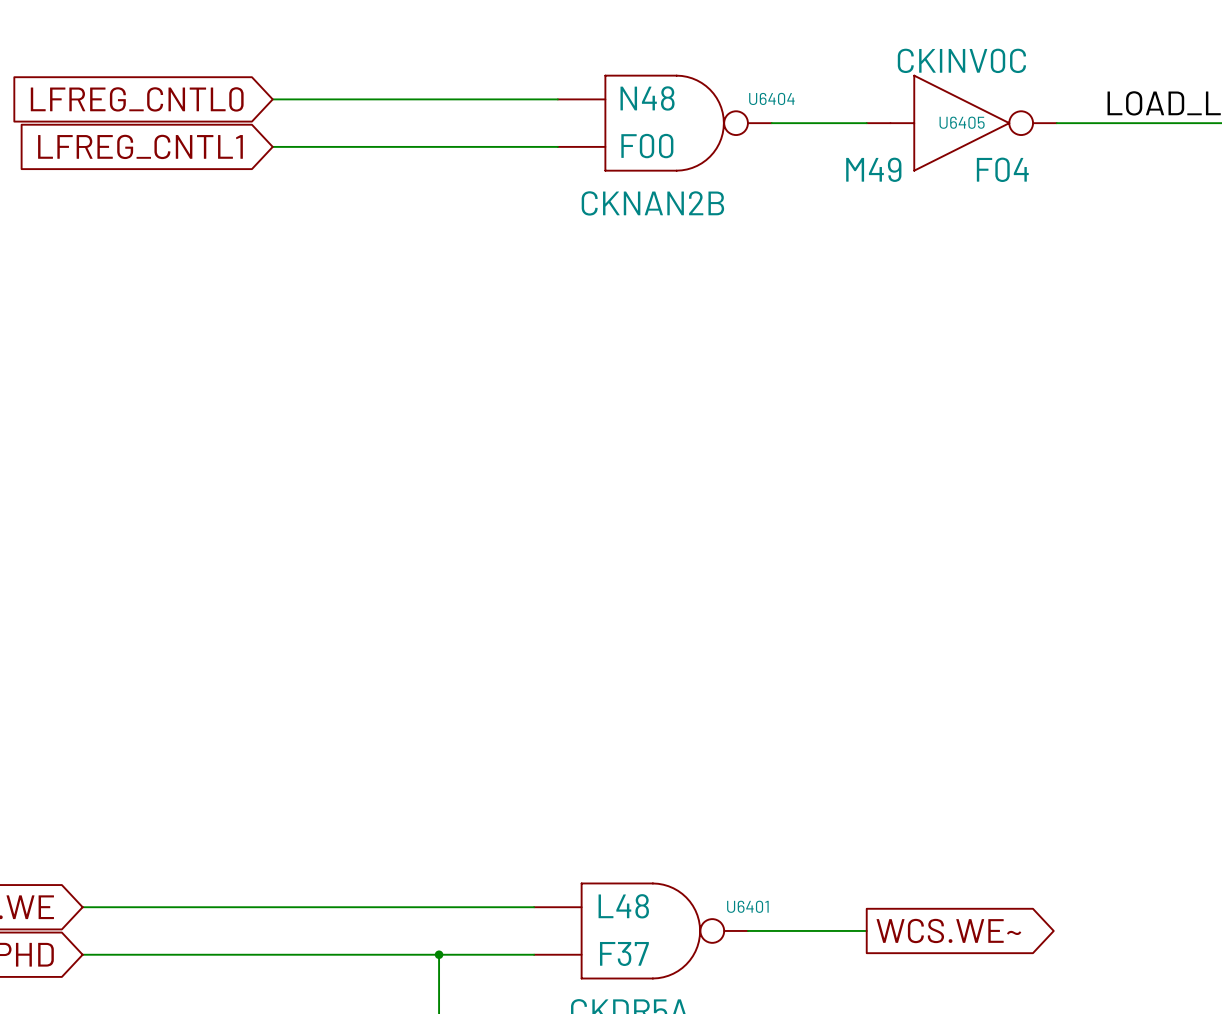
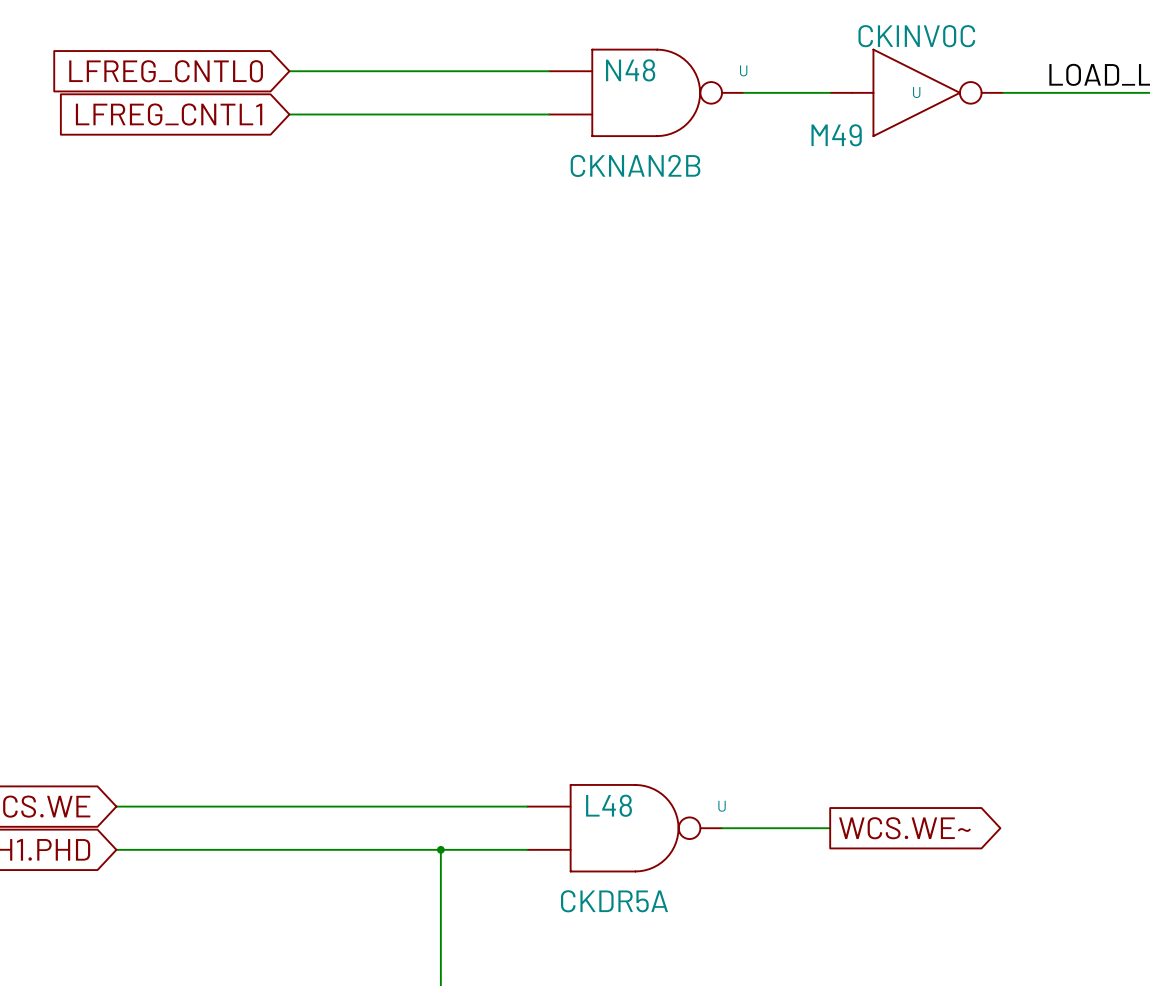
U6404 name: U6404 (771, 98) -> U (743, 70)
U6405 name: U6405 (962, 122) -> U (916, 92)
U6404 value: F00 (647, 146) -> none
U6405 value: F04 (1002, 169) -> none
U6401 name: U6401 (747, 906) -> U (722, 806)
U6401 value: F37 (624, 953) -> none

